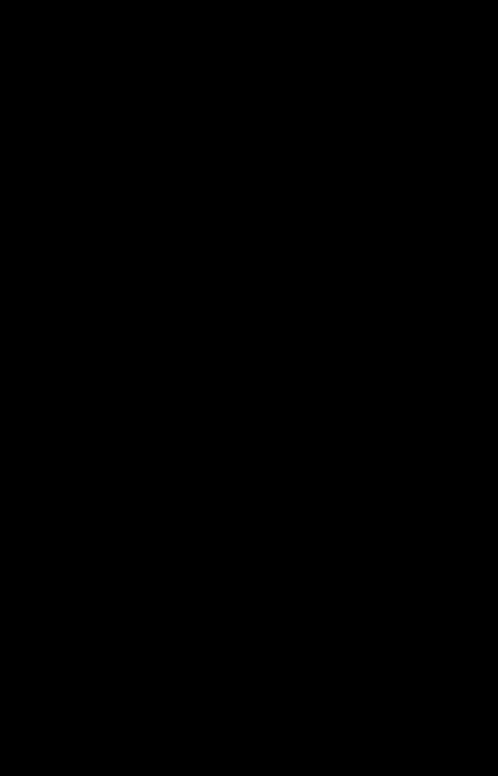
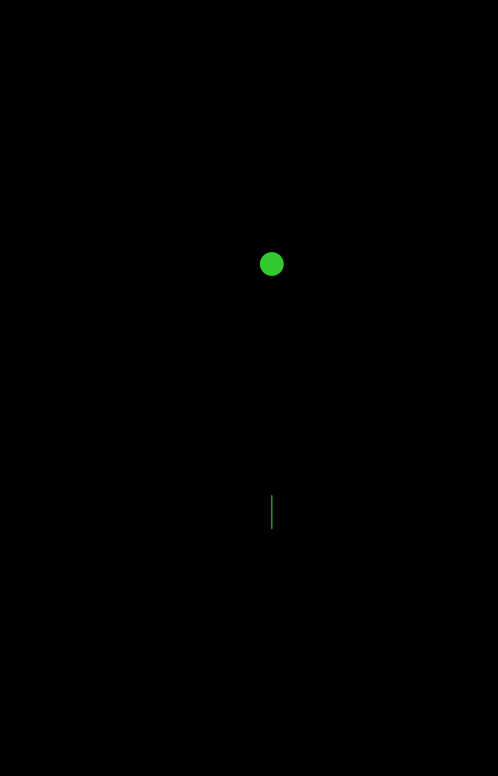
junction: none -> (271, 264)
wire: none -> (271, 495) (271, 528)

